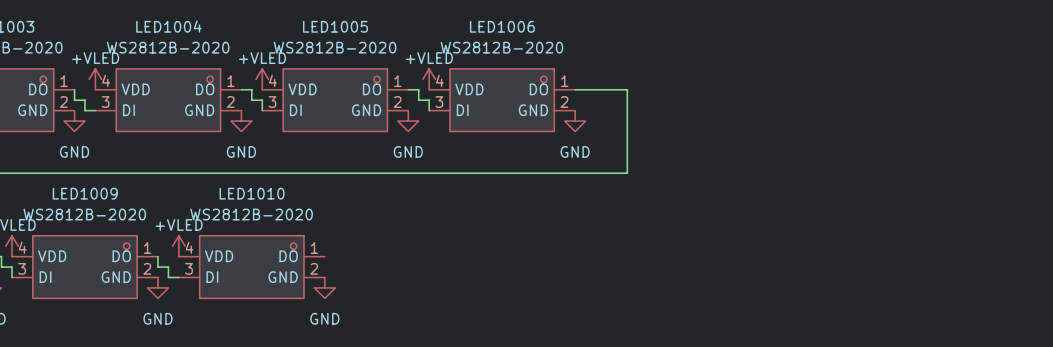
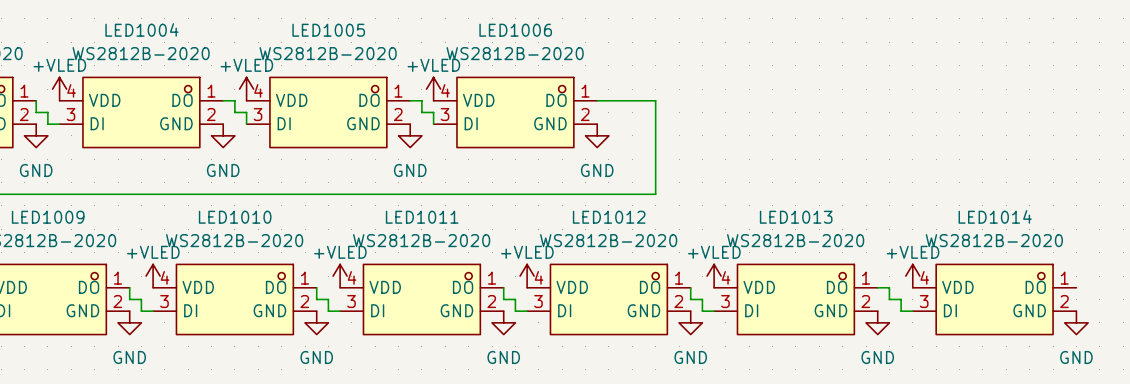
power symbol: none -> +VLED (340, 276)
power symbol: none -> +VLED (527, 276)
power symbol: none -> +VLED (714, 276)
power symbol: none -> +VLED (912, 276)
wire: none -> (316, 287) (316, 299) (328, 299) (328, 311) (340, 311)
wire: none -> (503, 287) (503, 299) (515, 299) (515, 311) (527, 311)
wire: none -> (690, 287) (690, 299) (702, 299) (702, 311) (714, 311)
wire: none -> (877, 287) (889, 287) (889, 299) (901, 299) (901, 311) (912, 311)
LED1011: none -> WS2812B-2020 (421, 299)
LED1012: none -> WS2812B-2020 (608, 299)
LED1013: none -> WS2812B-2020 (795, 299)
LED1014: none -> WS2812B-2020 (994, 299)
power symbol: none -> GND (503, 322)
power symbol: none -> GND (690, 322)
power symbol: none -> GND (877, 322)
power symbol: none -> GND (1076, 322)

